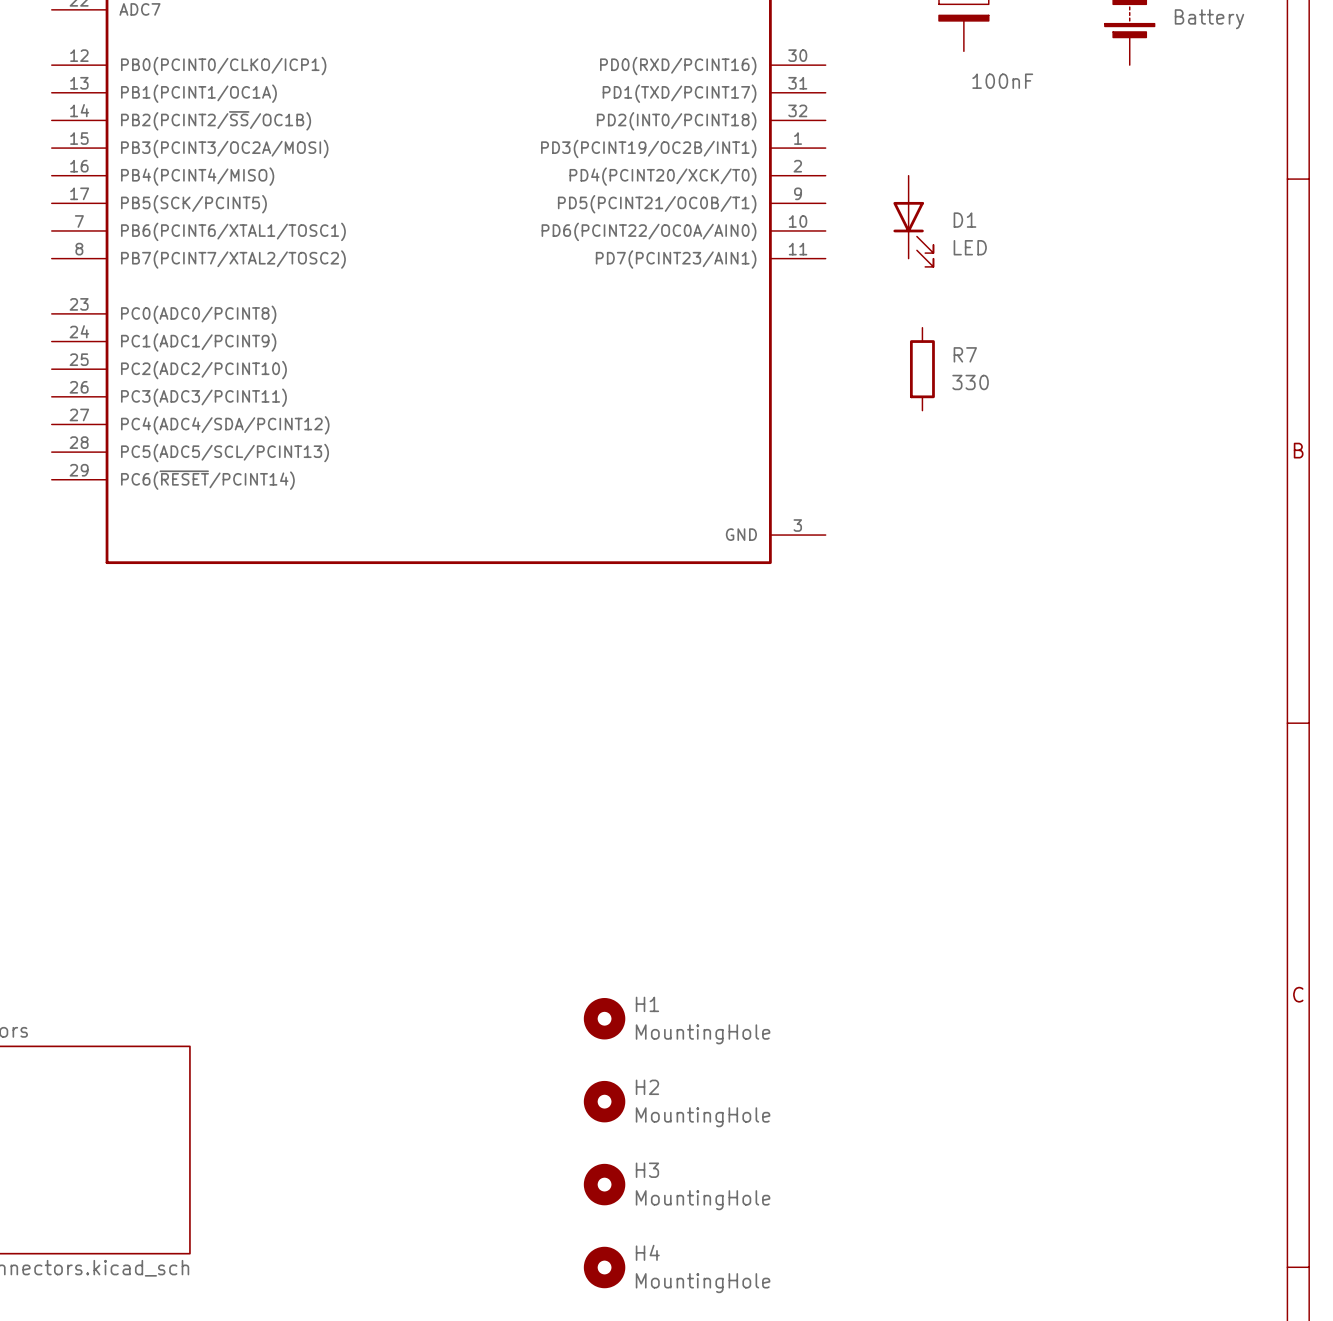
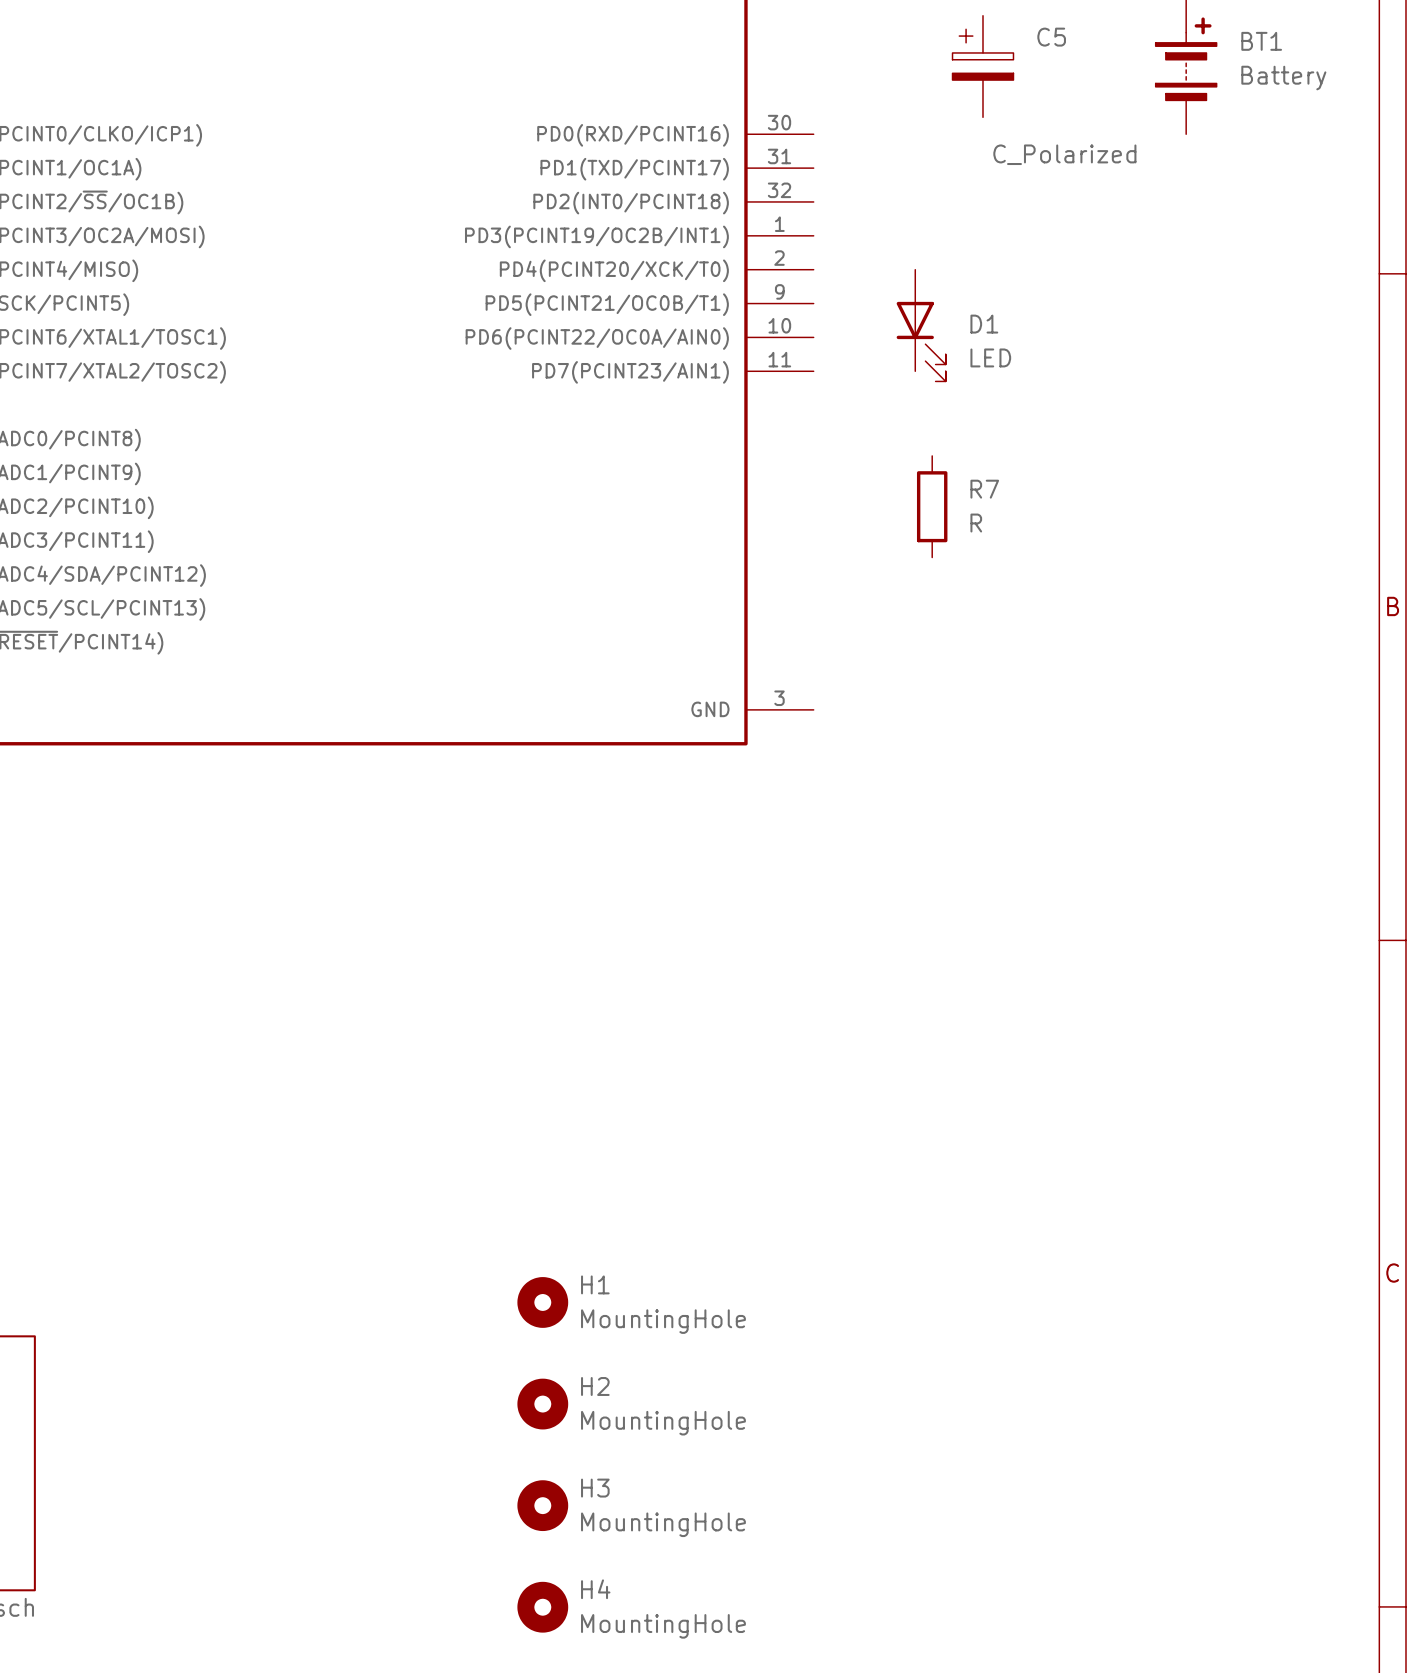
C5 value: 100nF (1002, 81) -> C_Polarized (1064, 154)
R7 value: 330 (970, 382) -> R (976, 523)

